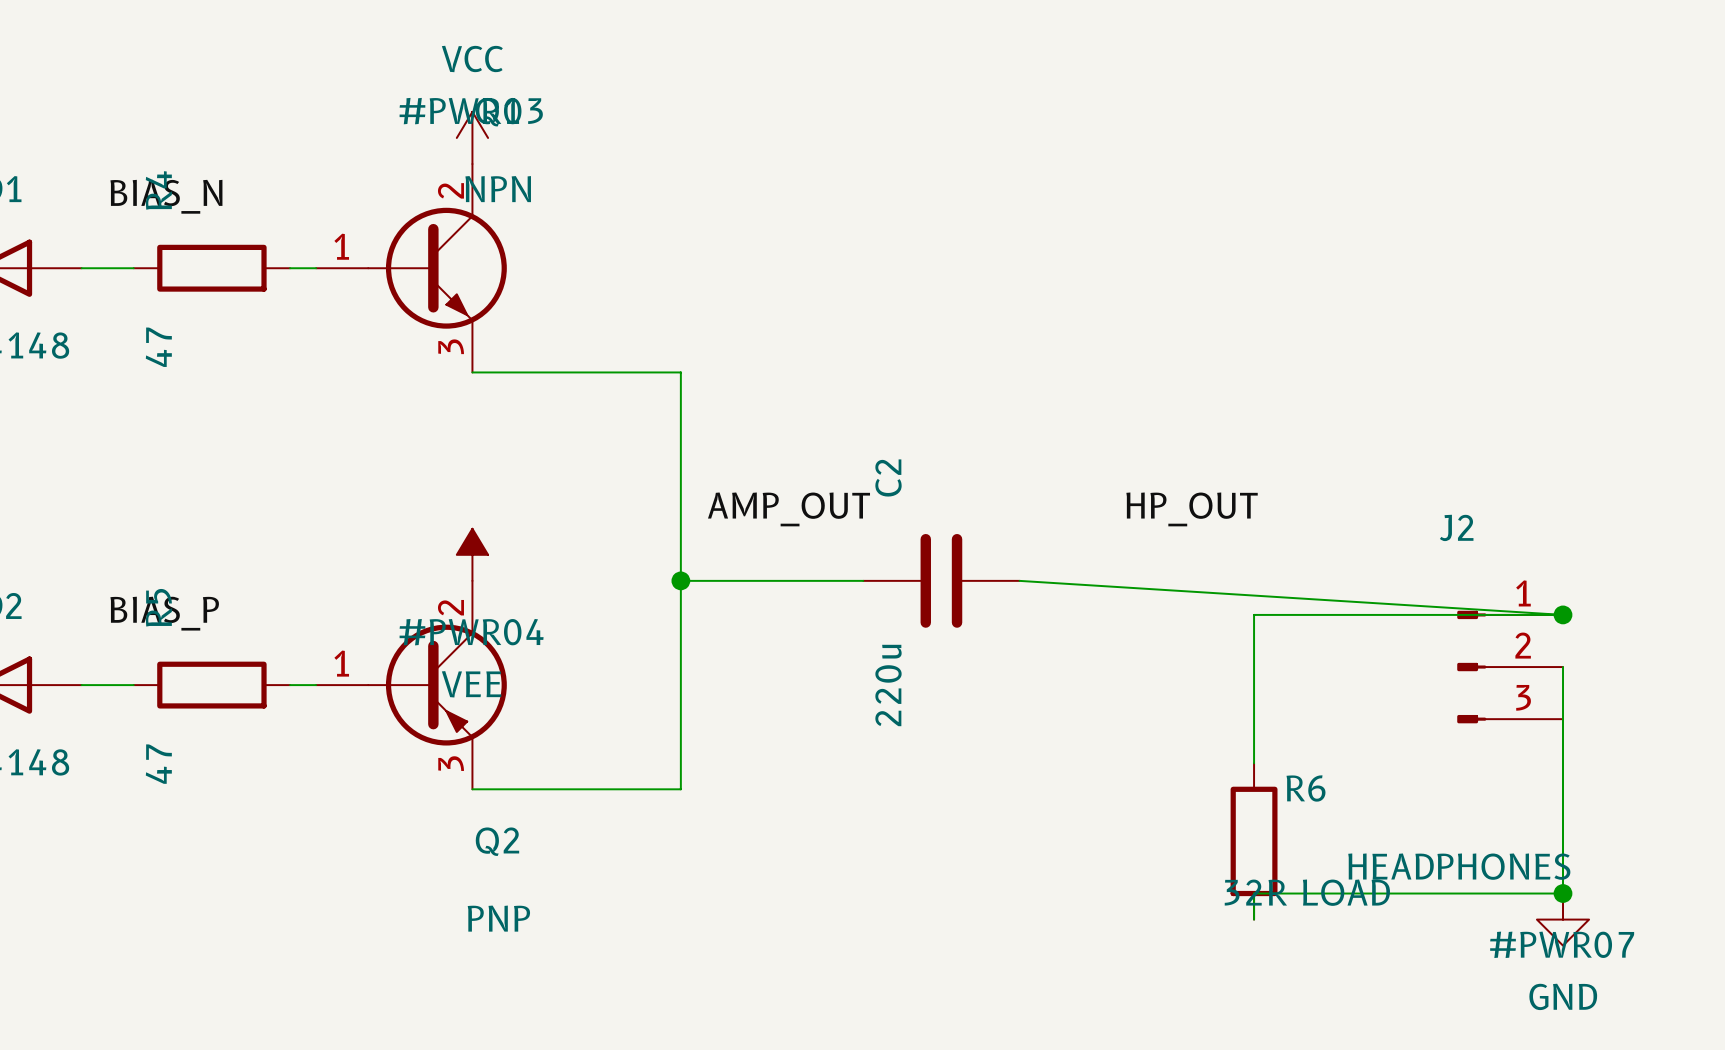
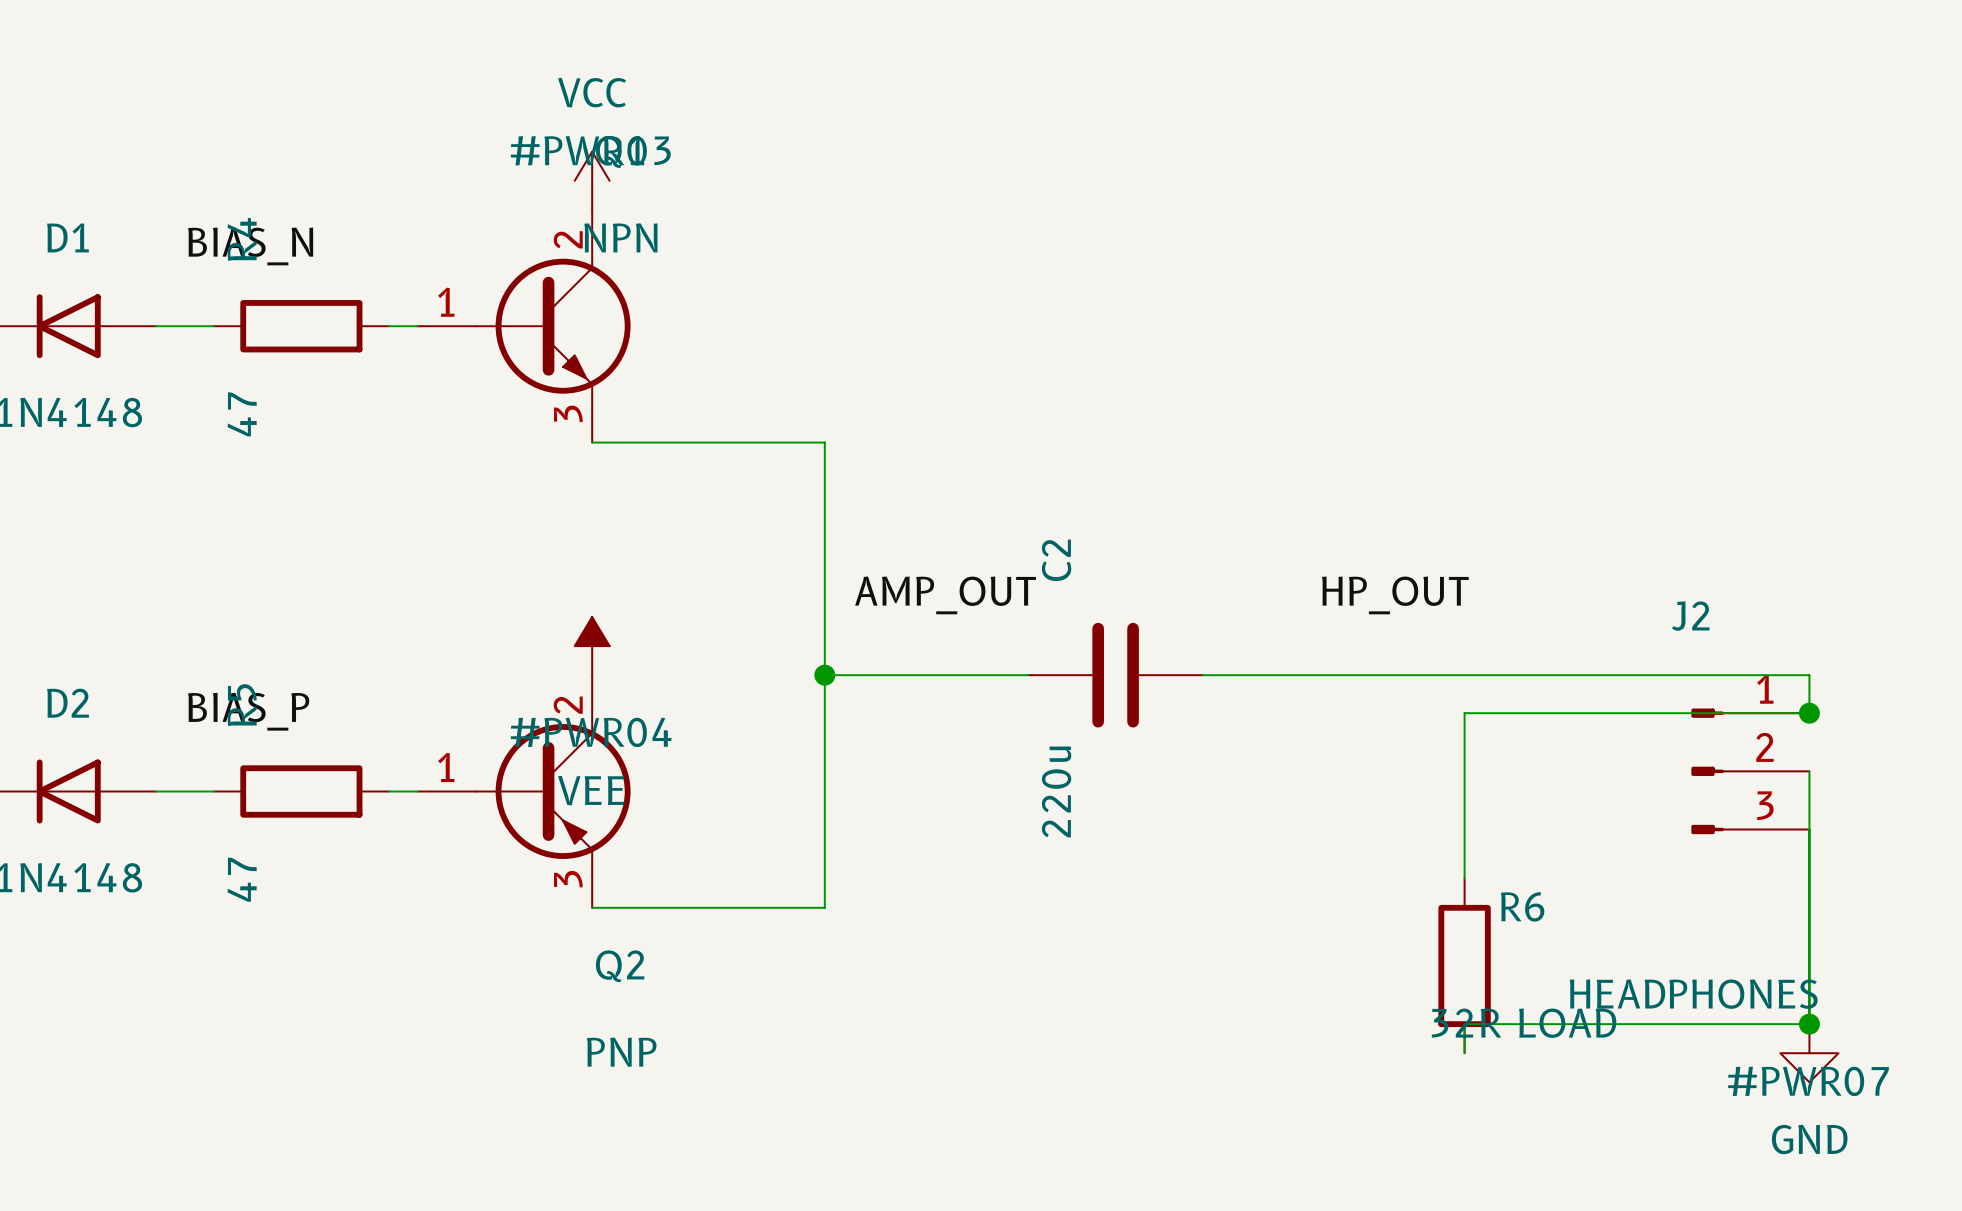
wire: (1019, 580) (1563, 614) -> (1202, 675) (1809, 675) (1809, 713)

